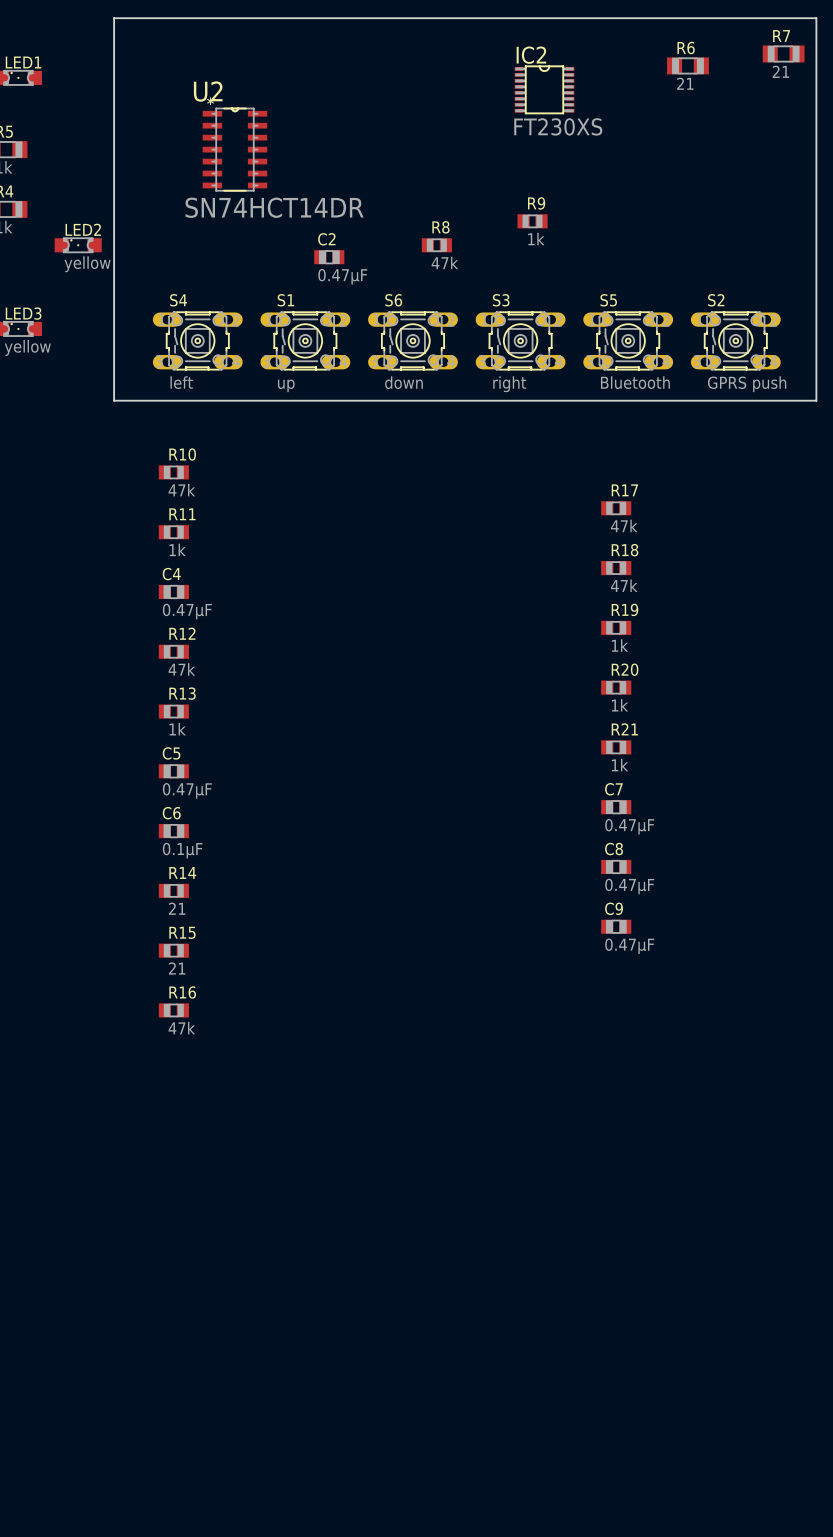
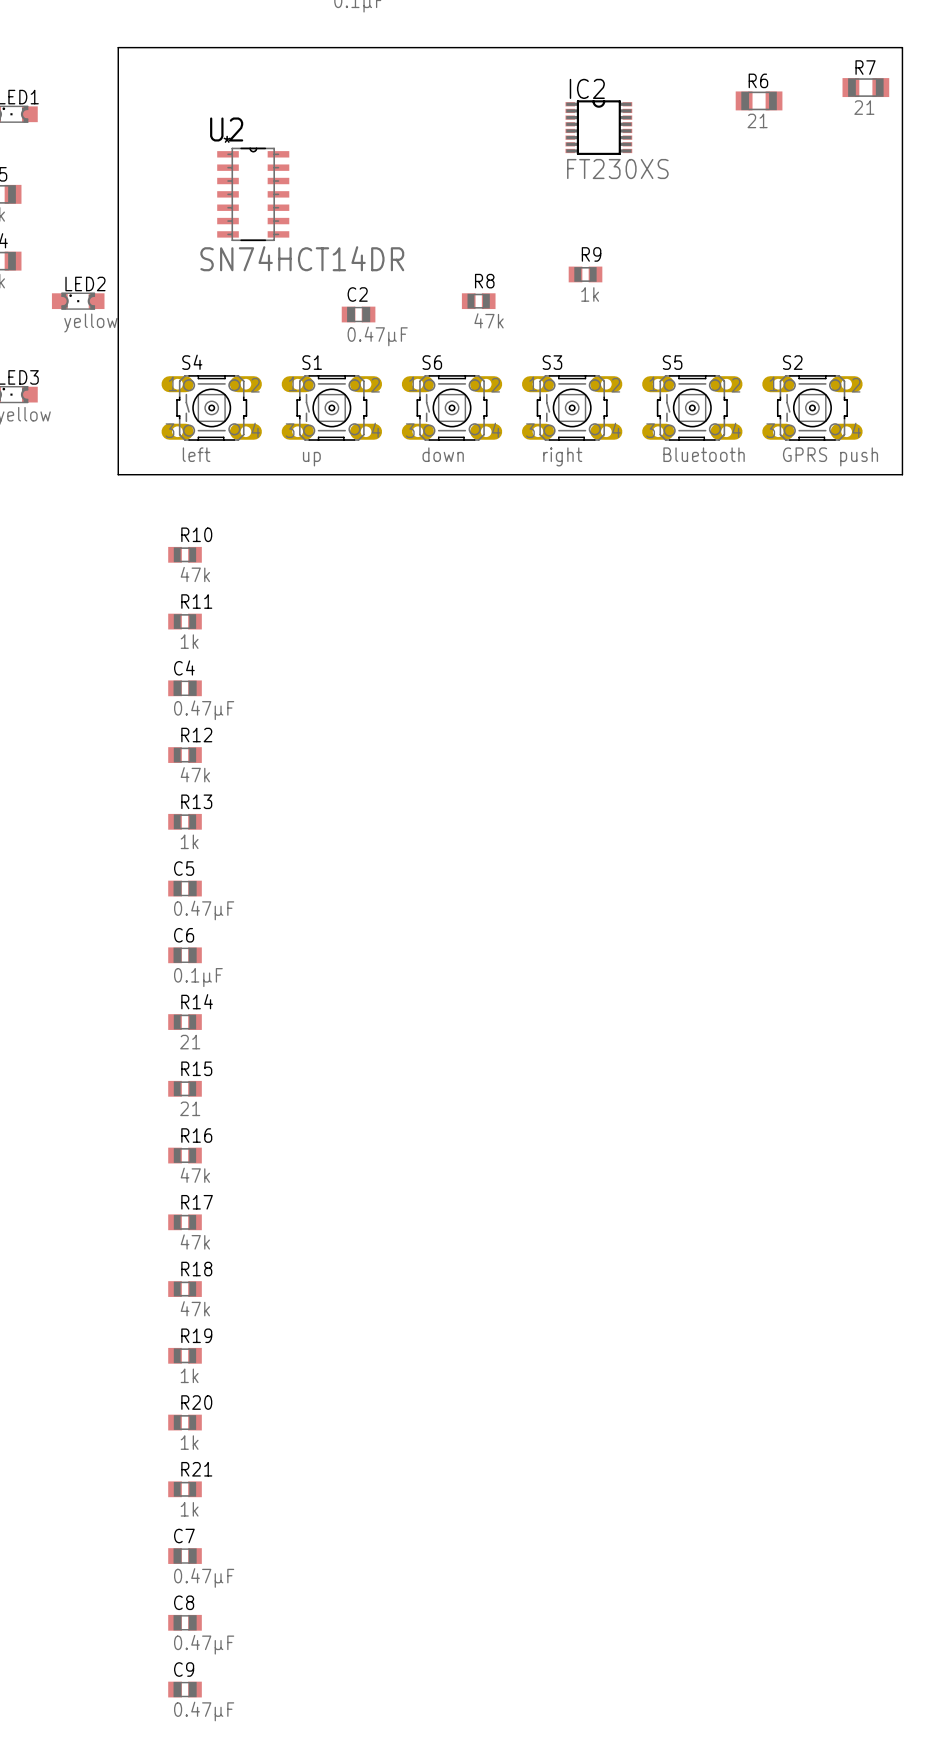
R17 position: (616, 508) -> (185, 1222)
R18 position: (616, 568) -> (185, 1289)
R19 position: (616, 627) -> (185, 1355)
R20 position: (616, 687) -> (185, 1422)
R21 position: (616, 747) -> (185, 1489)
C7 position: (616, 807) -> (185, 1556)
C8 position: (616, 866) -> (185, 1622)
C9 position: (616, 926) -> (185, 1689)

